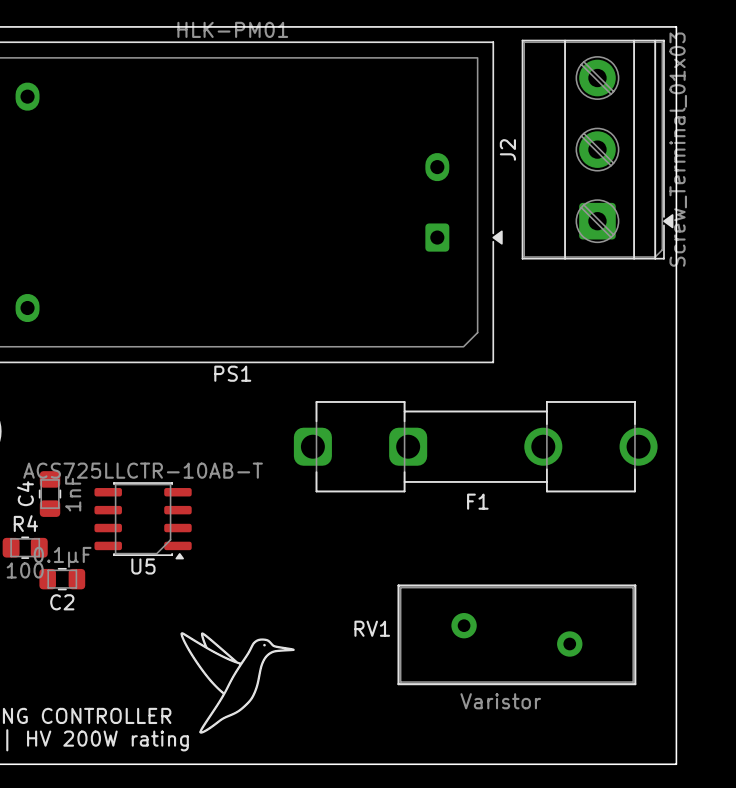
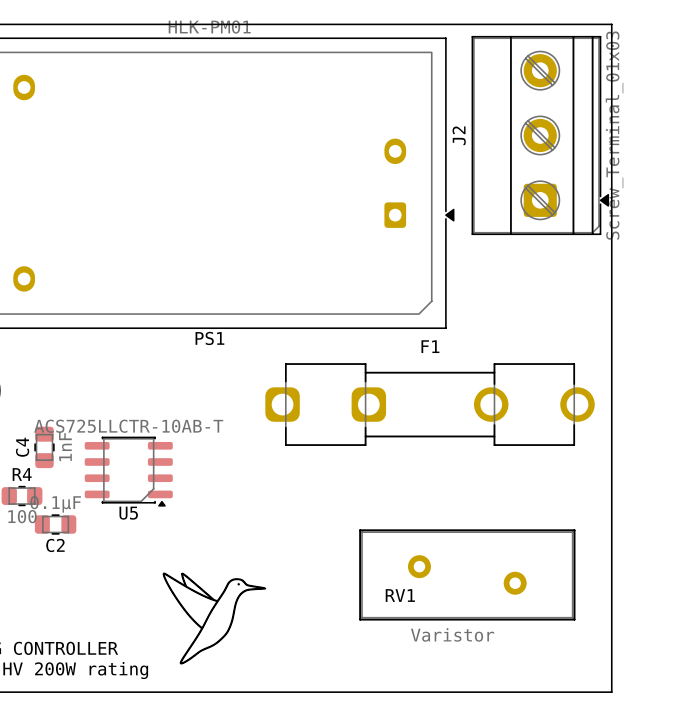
F1 name position: F1 (477, 501) -> F1 (430, 346)
RV1 name position: RV1 (372, 628) -> RV1 (400, 595)

